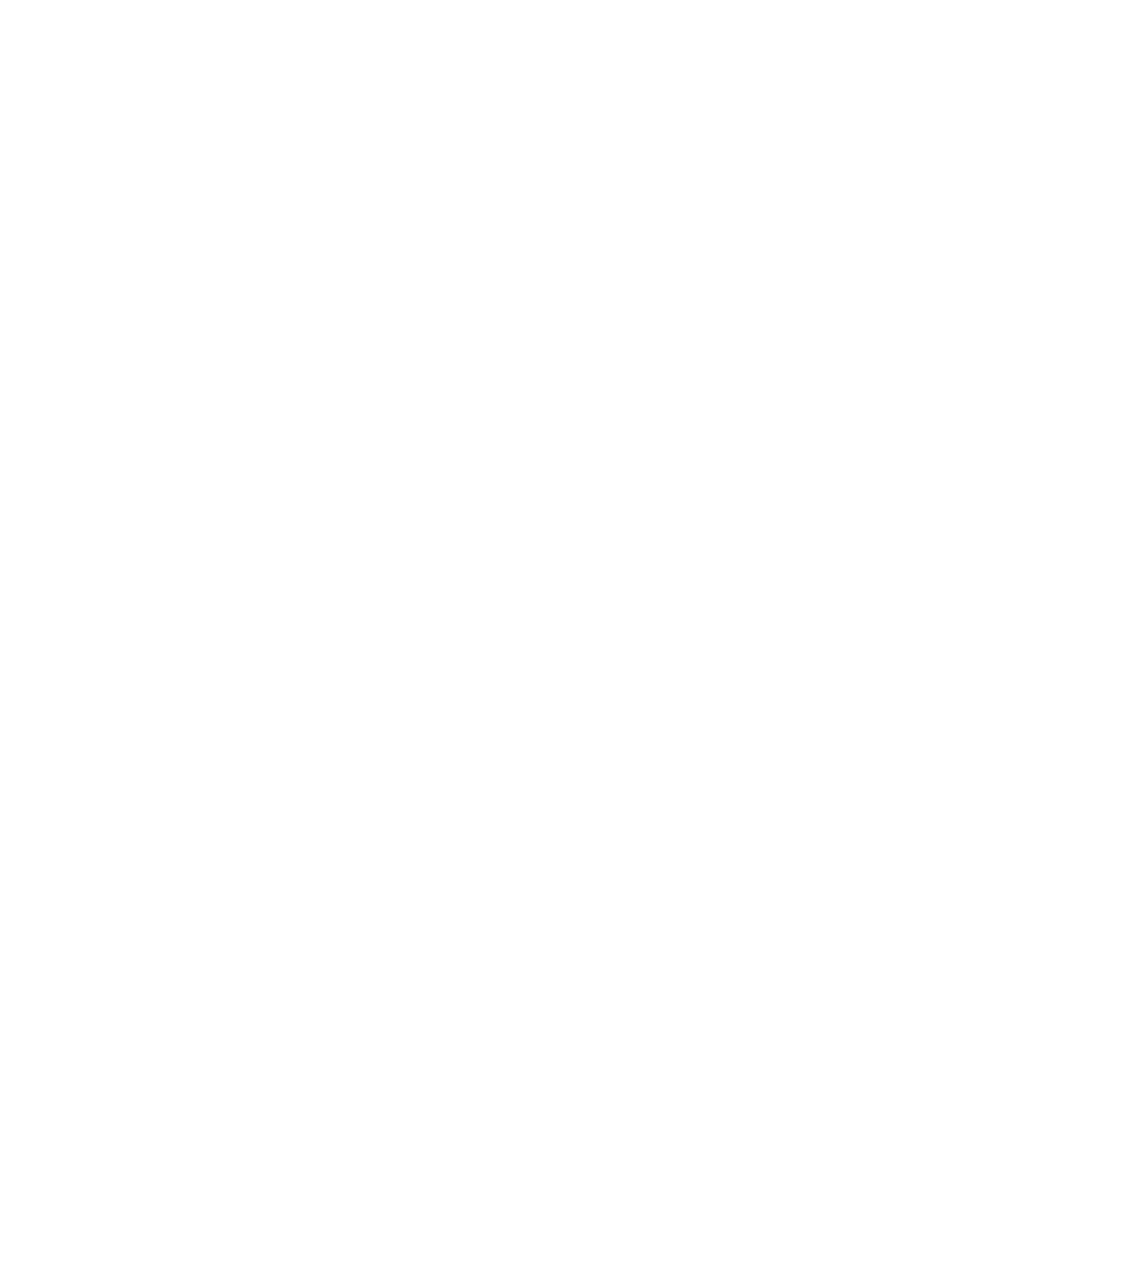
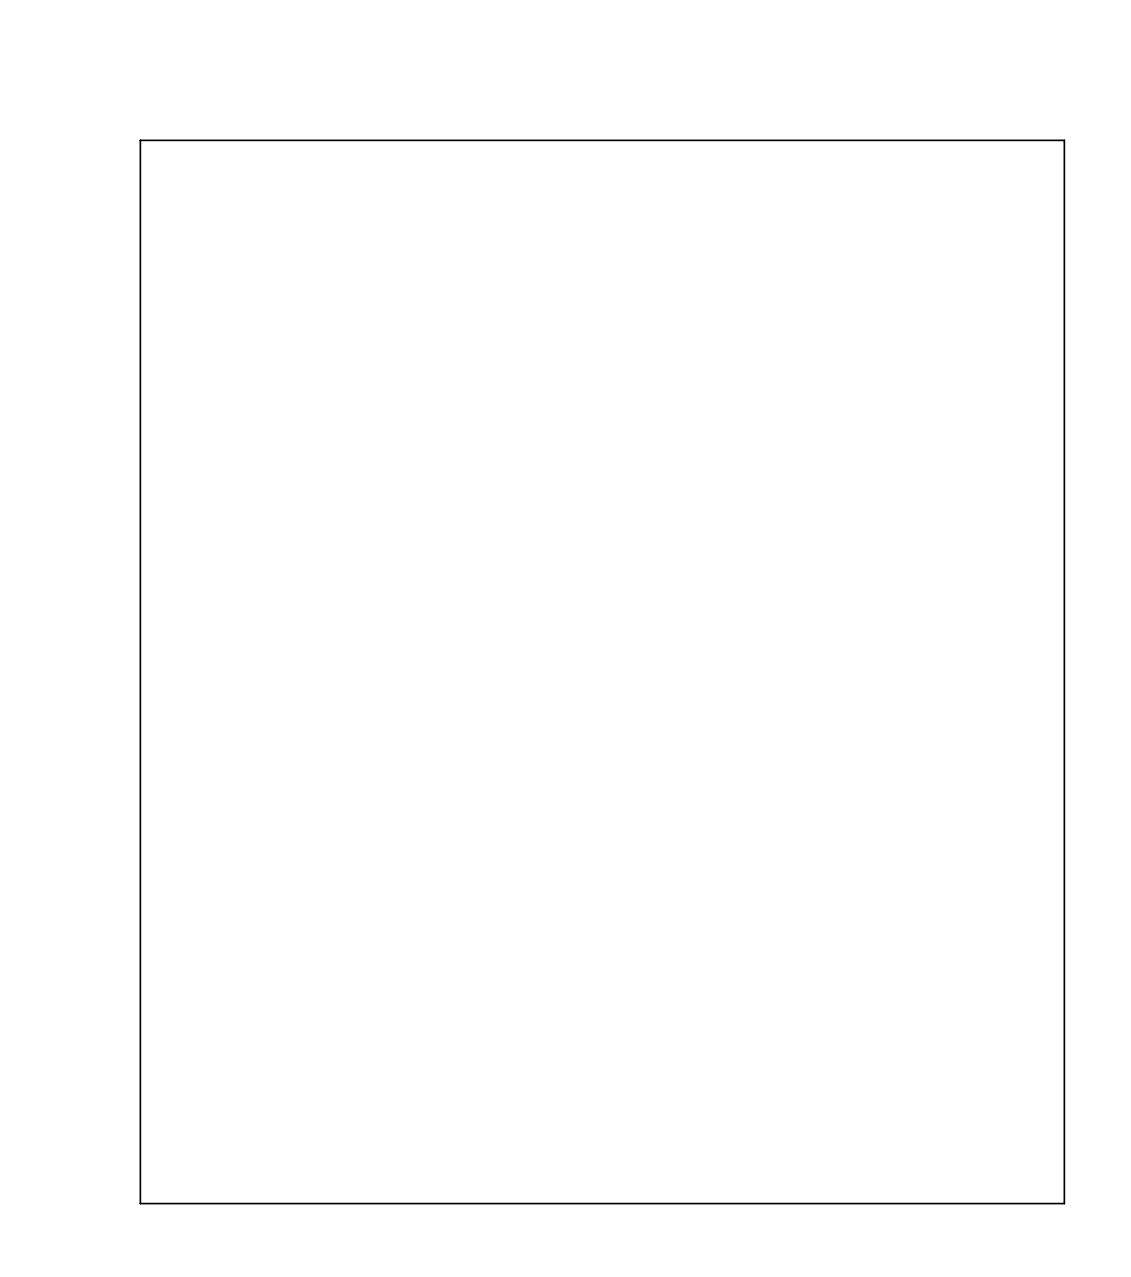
board edge: none -> (1064, 140) (140, 140) (140, 1203) (1064, 1203) (1064, 140)

